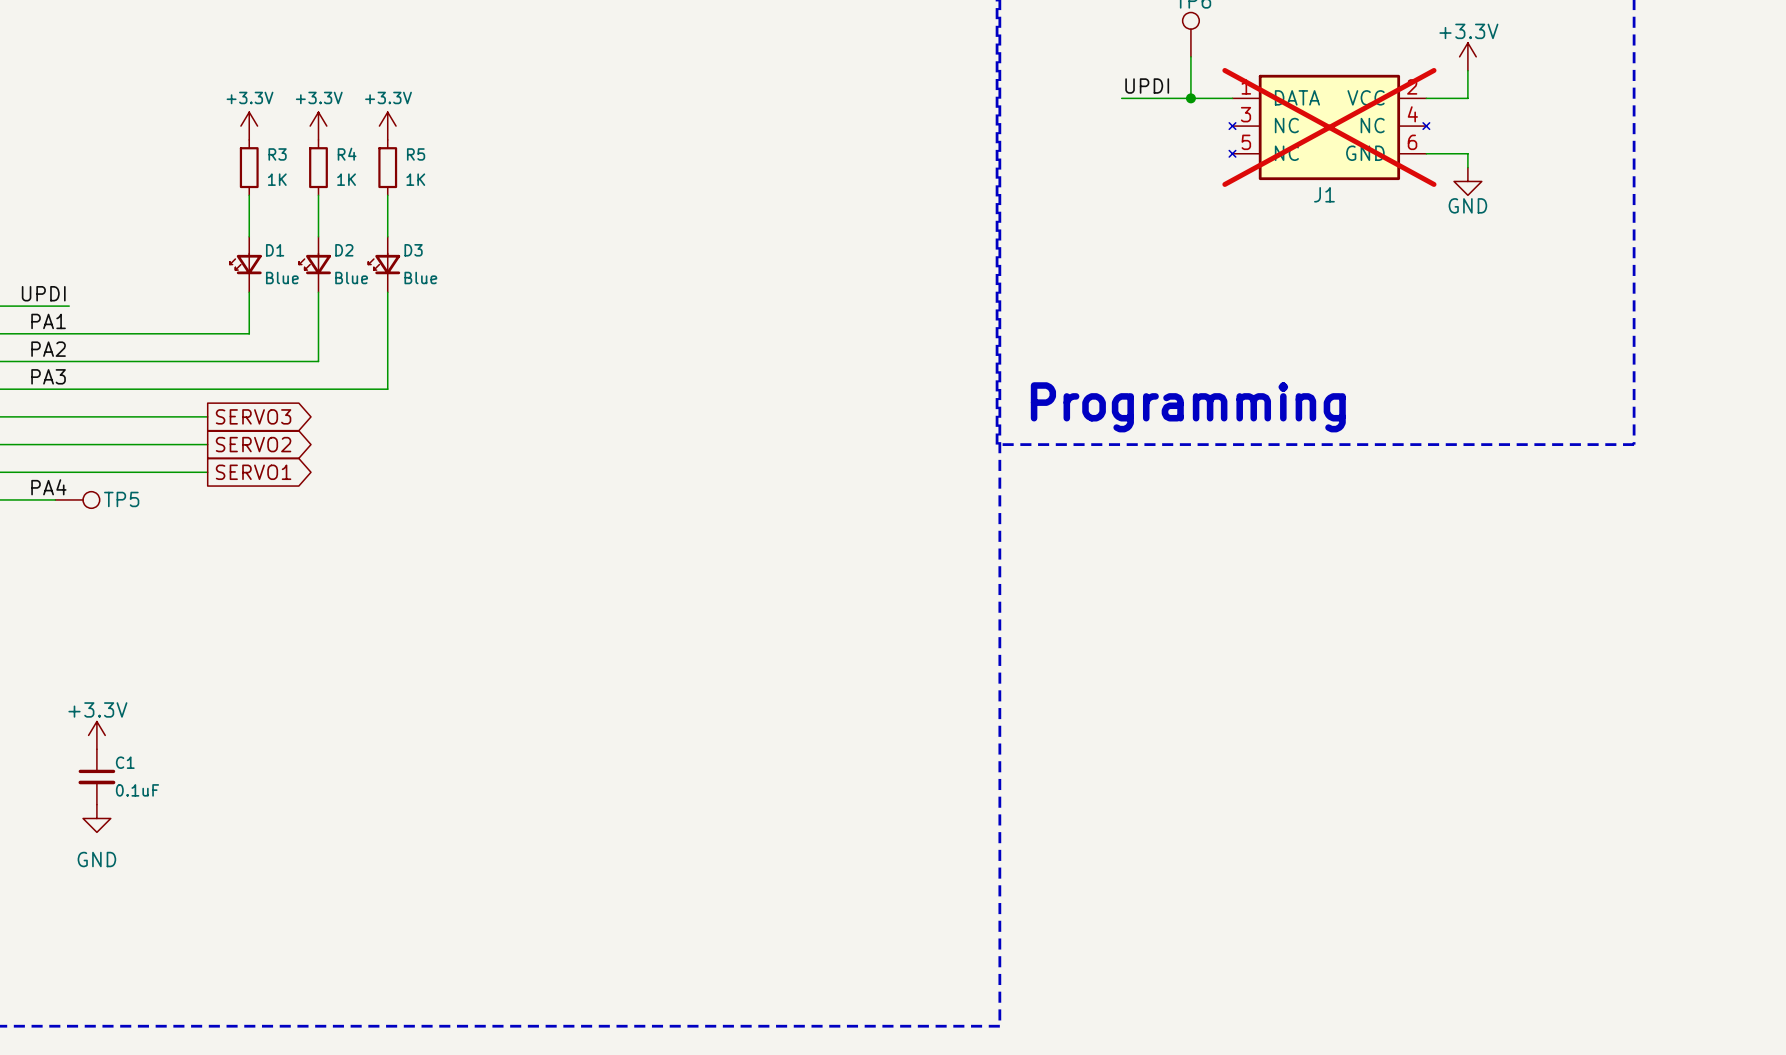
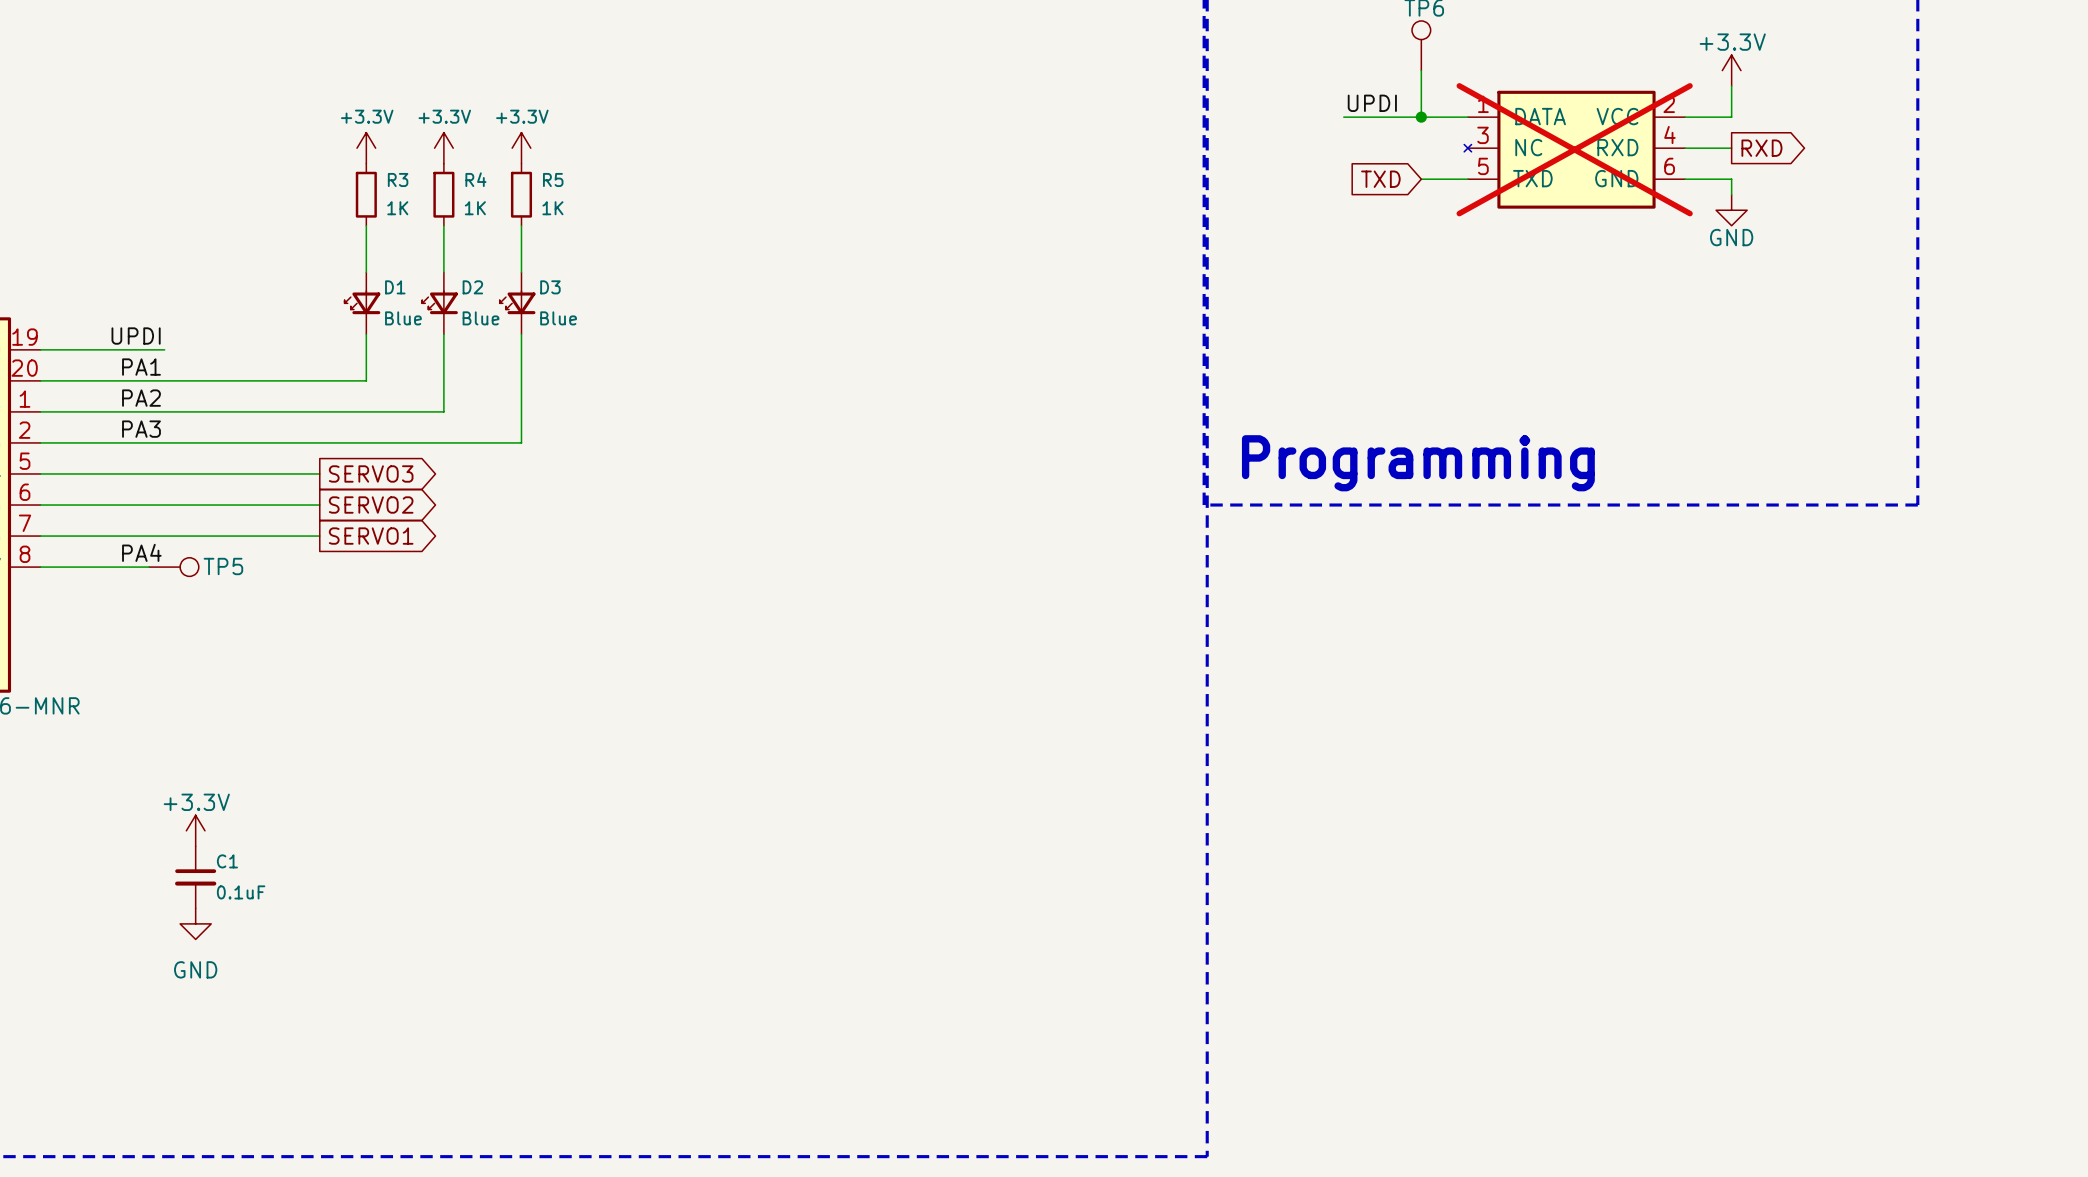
wire: none -> (1685, 148) (1731, 148)
global label: none -> RXD (1761, 148)
part: none -> (1574, 149)
J1: (1329, 127) -> none
global label: none -> TXD (1380, 179)
wire: none -> (1421, 179) (1467, 179)

